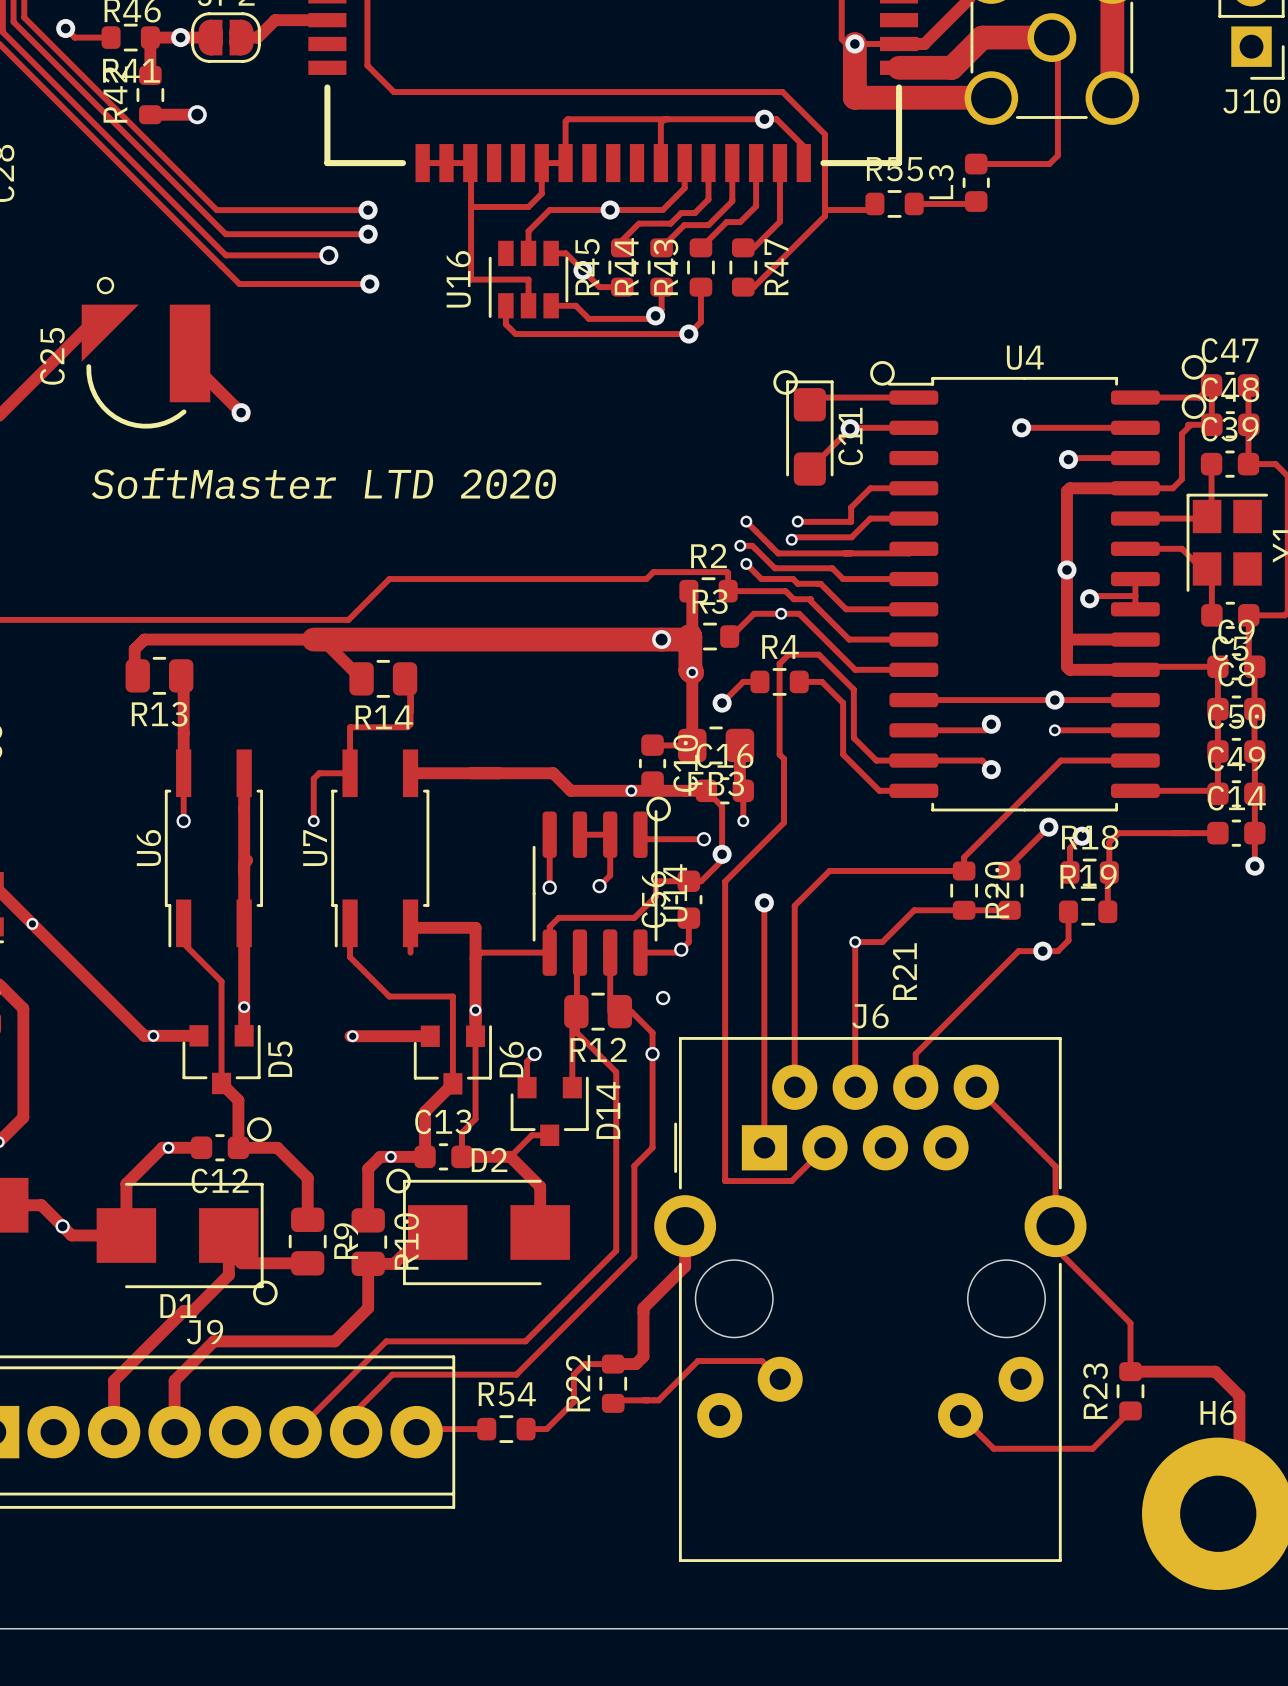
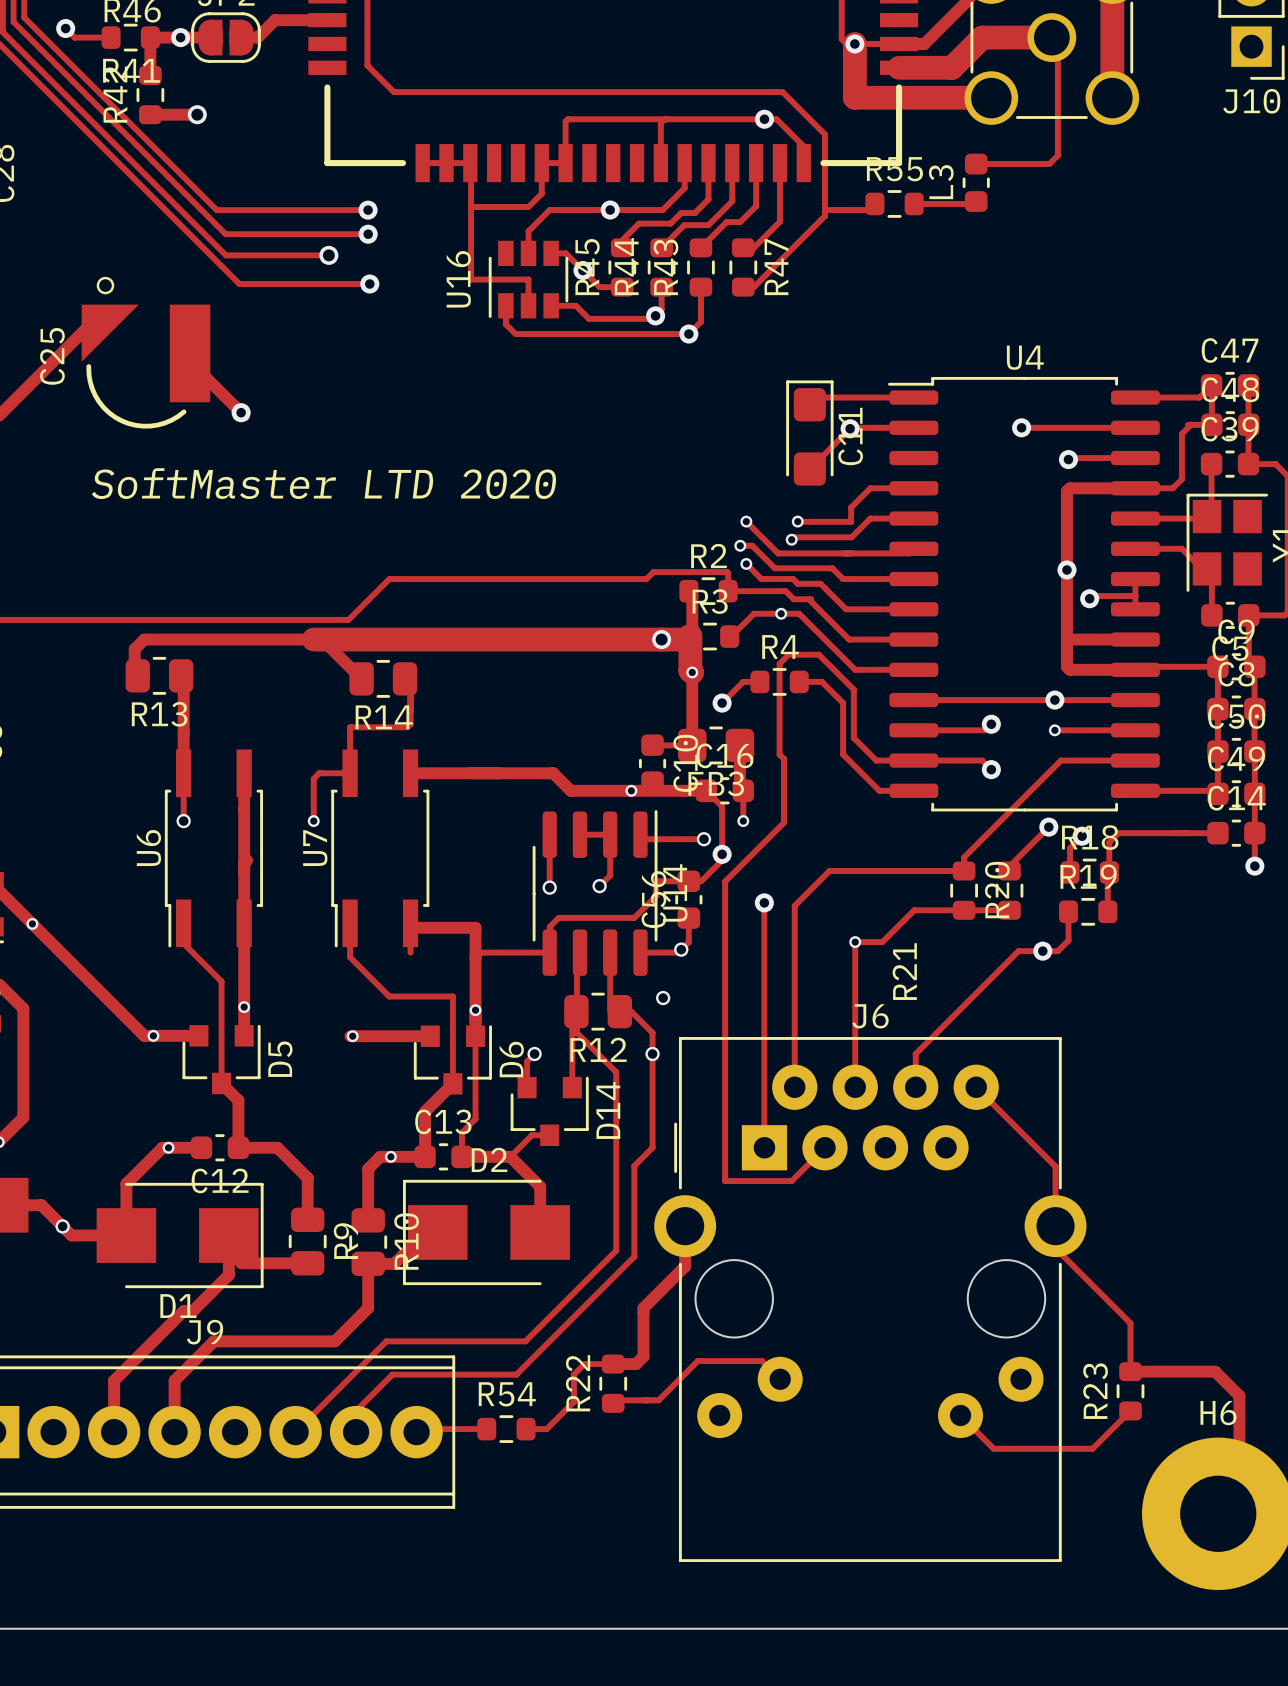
drawing: [1181, 354, 1207, 419] -> none
drawing: [870, 361, 895, 386] -> none
drawing: [773, 370, 798, 395] -> none
drawing: [646, 796, 671, 822] -> none
drawing: [246, 1117, 272, 1142] -> none
drawing: [386, 1168, 411, 1194] -> none
drawing: [253, 1280, 278, 1306] -> none

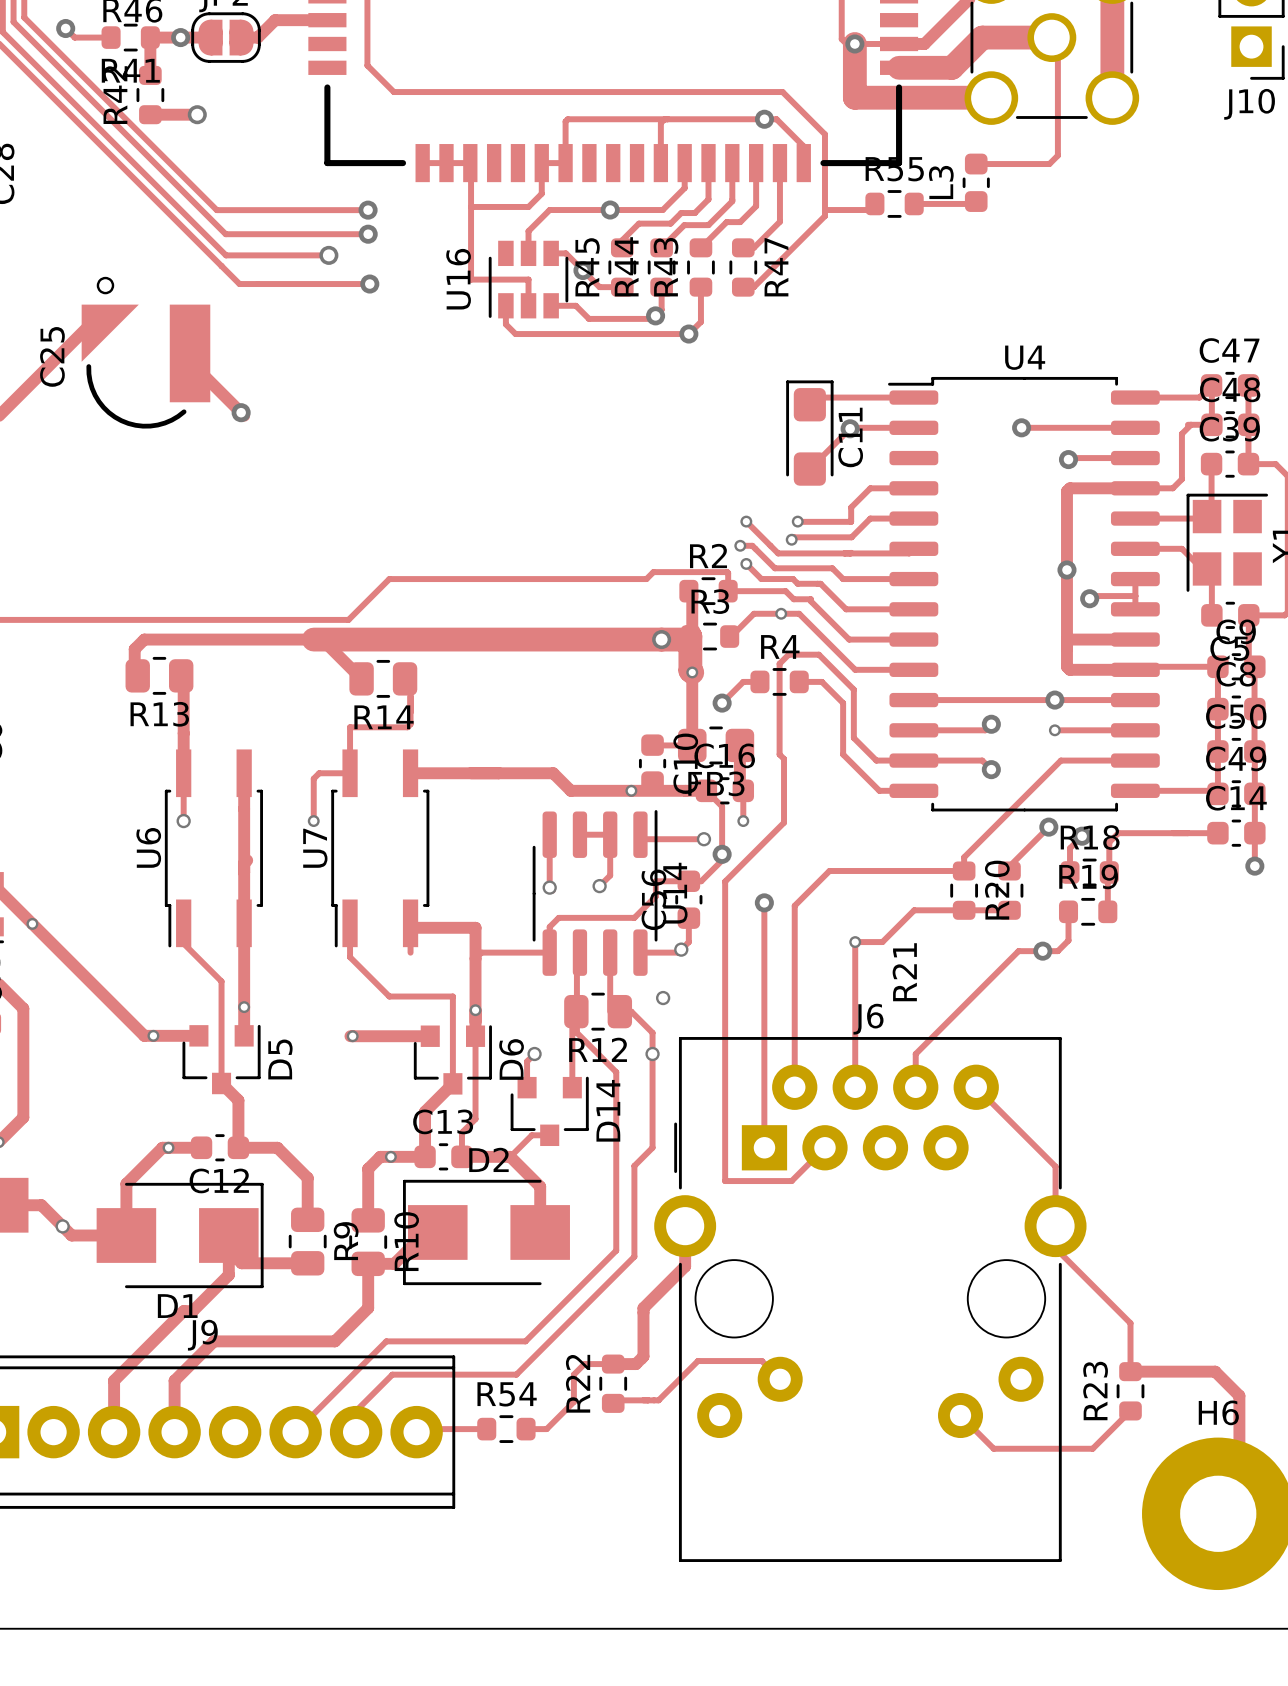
text: SoftMaster LTD 2020 (323, 483) -> none

